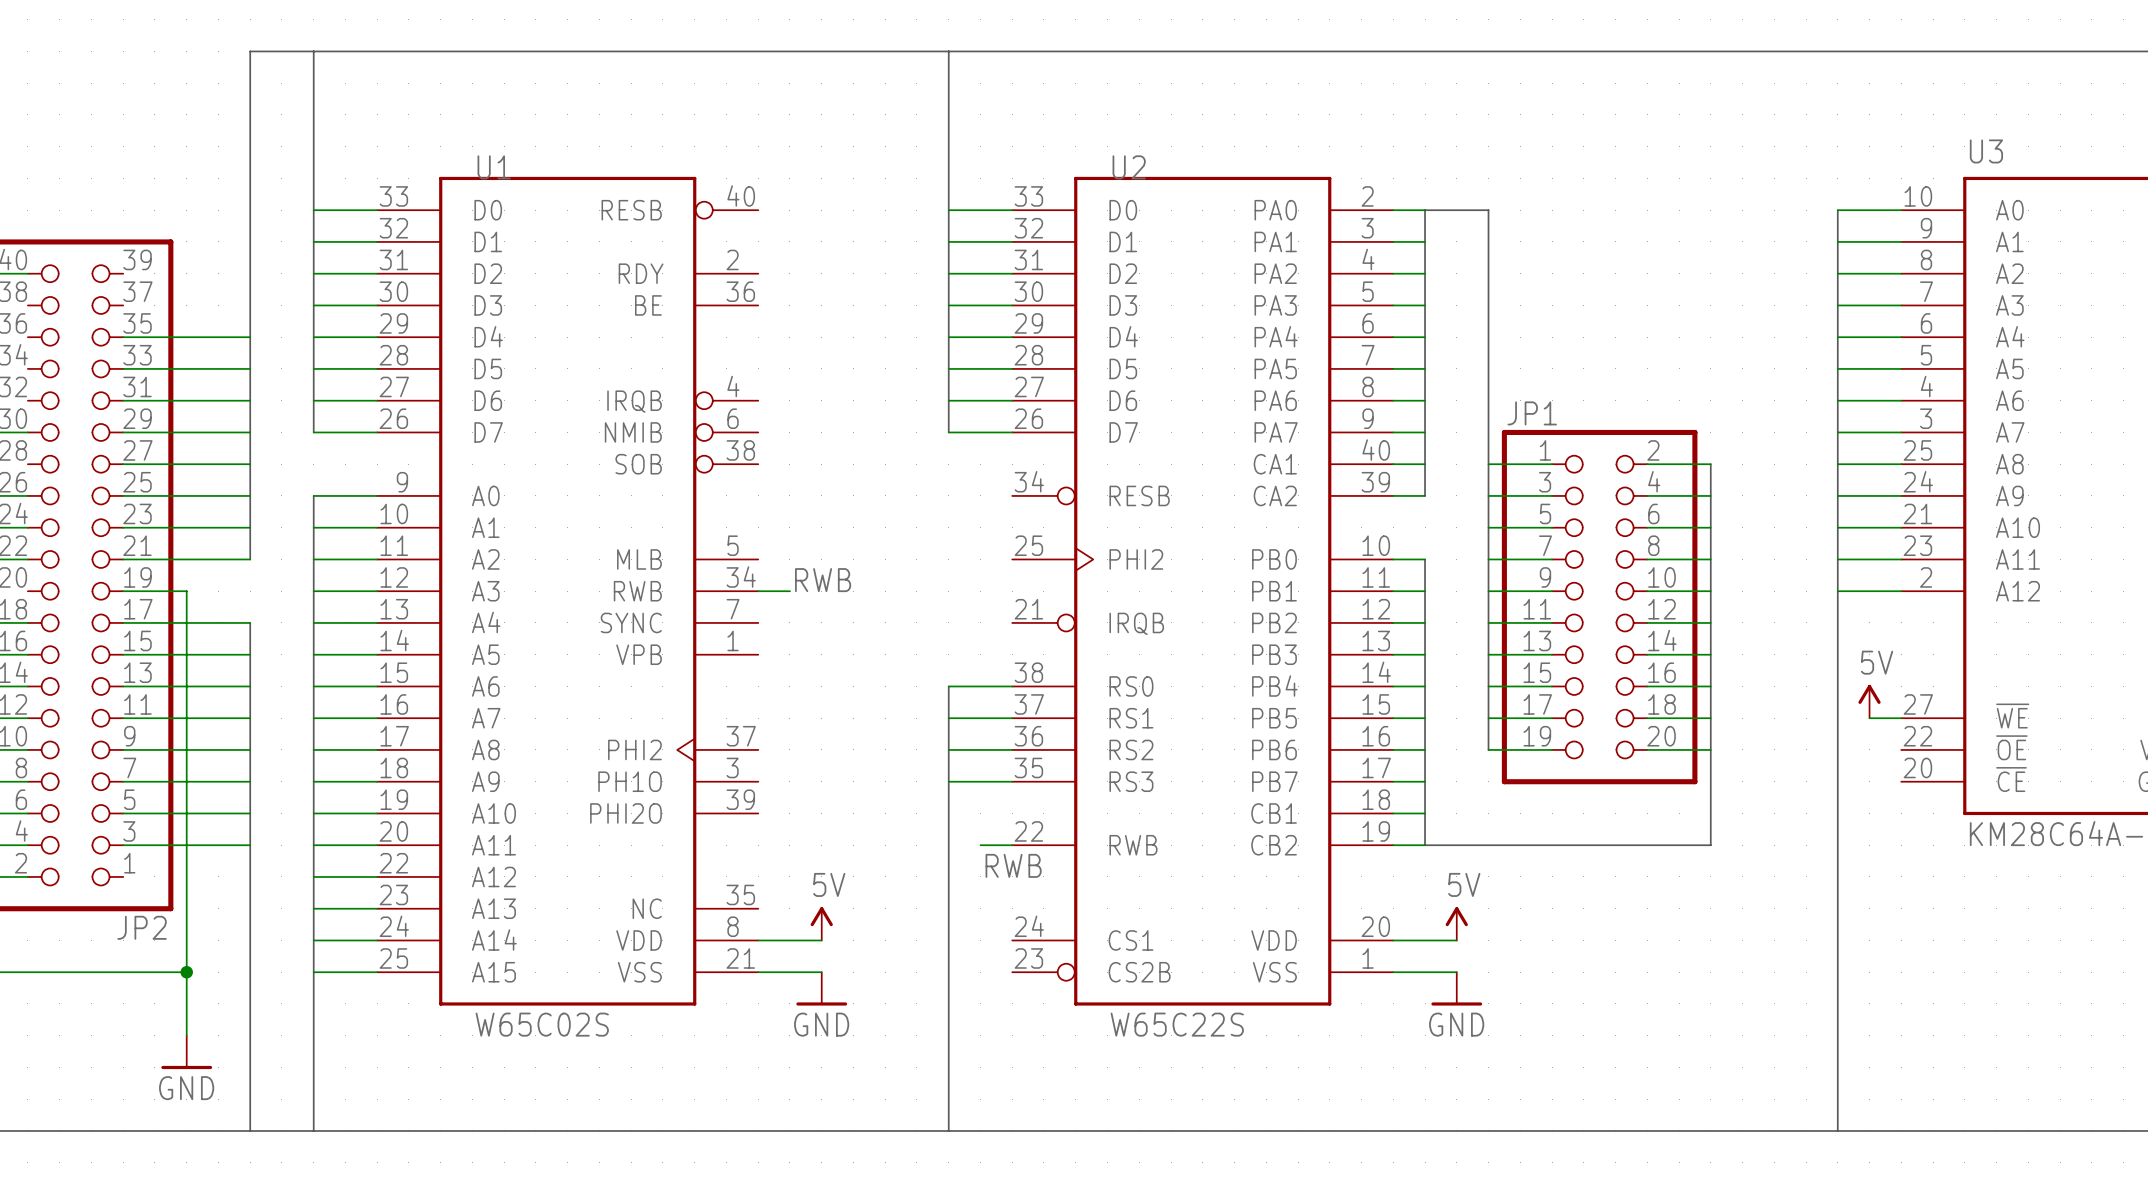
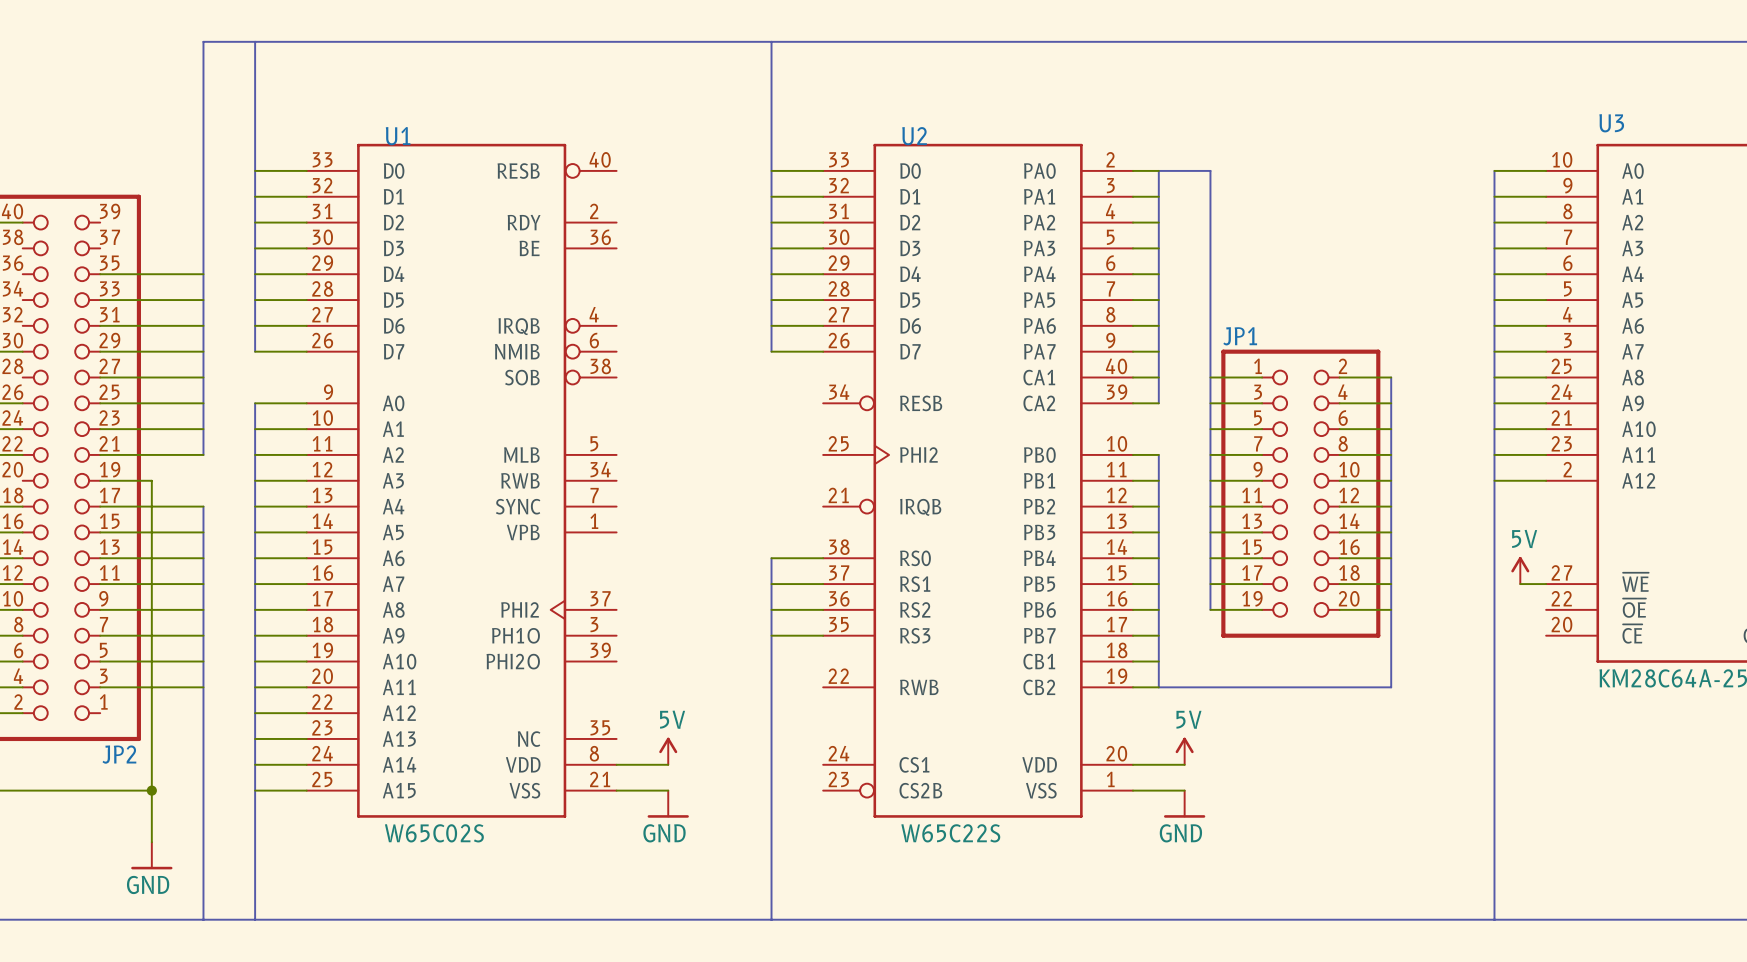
label: RWB (823, 580) -> none
wire: (758, 591) (789, 591) -> none
wire: (980, 845) (1012, 845) -> none
label: RWB (1013, 865) -> none

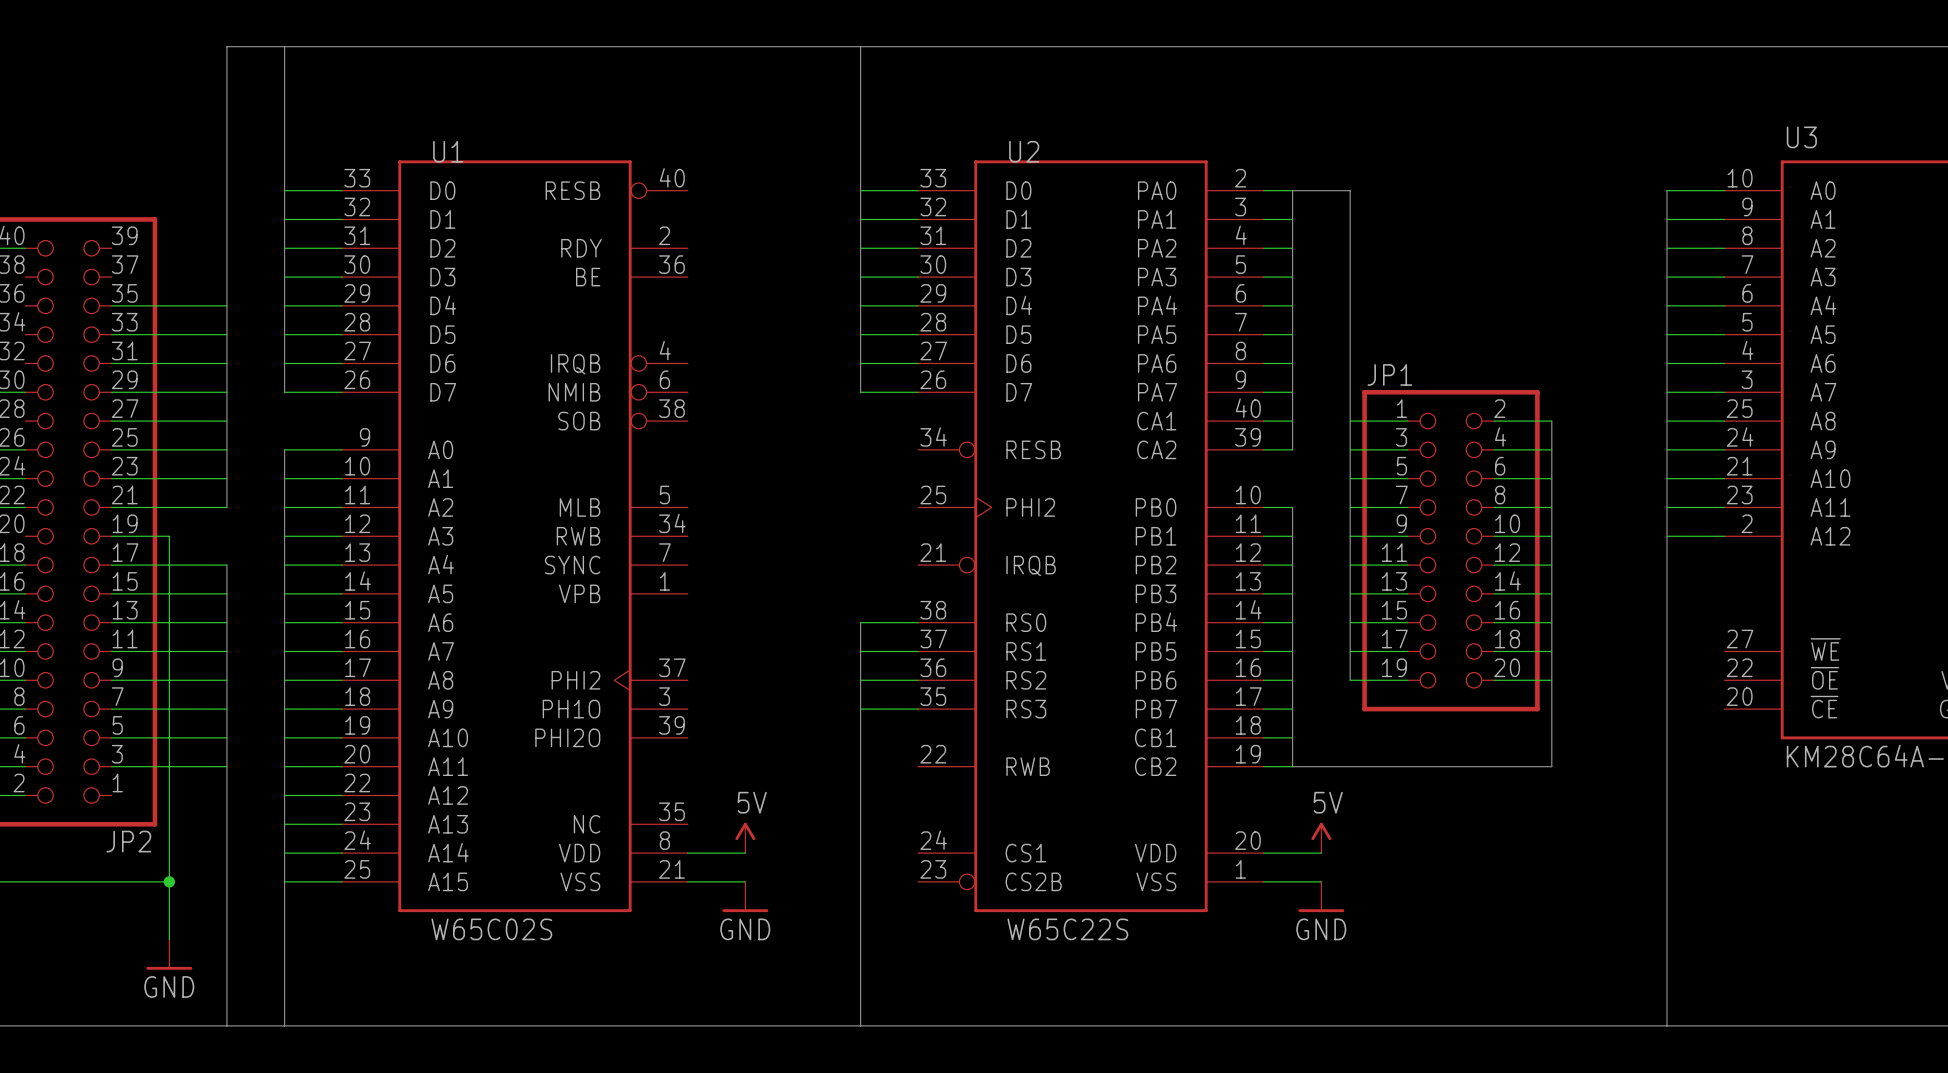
power symbol: 5V (1520, 570) -> none
wire: (1520, 584) (1546, 584) -> none

